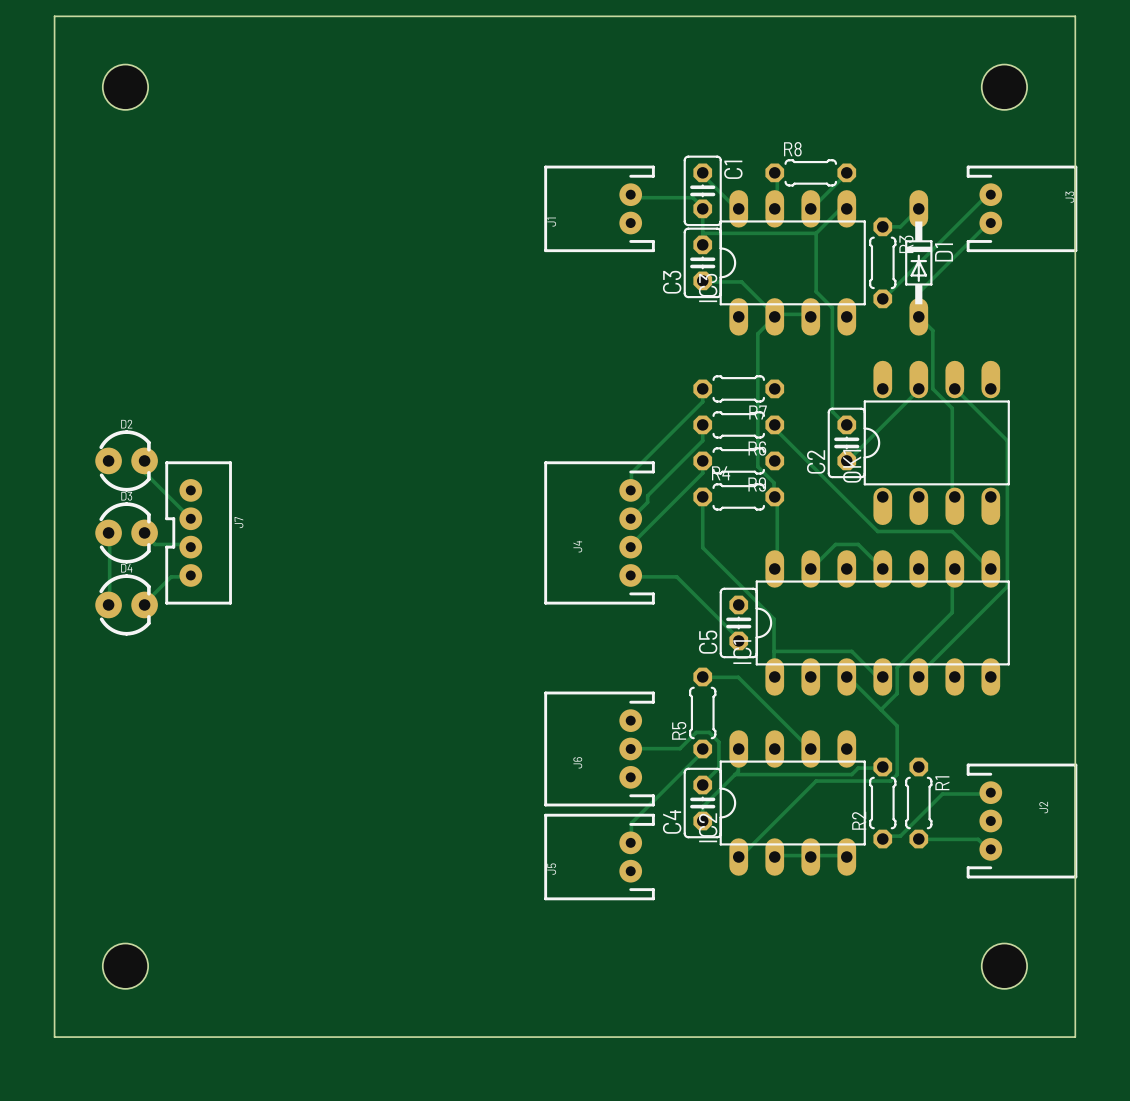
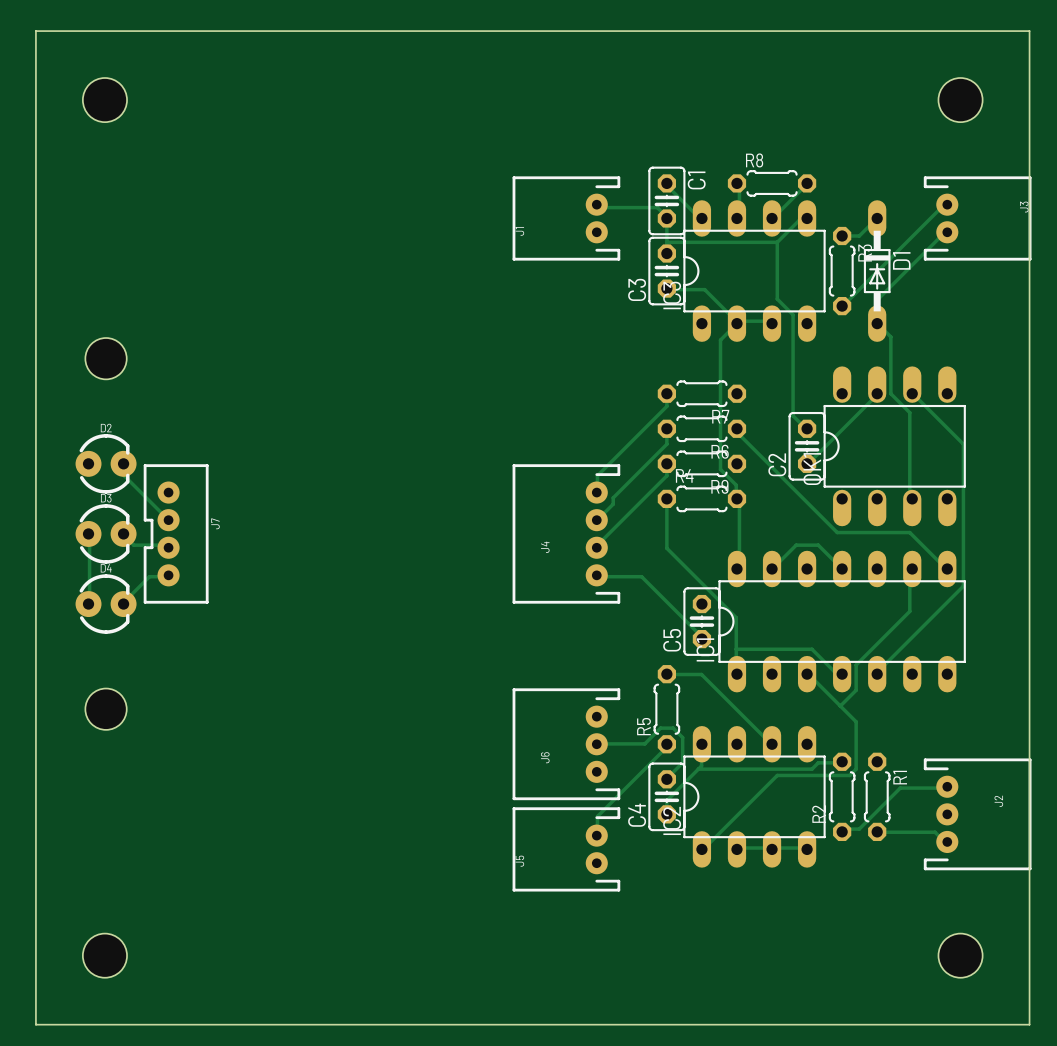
hole: none -> (106, 358)
hole: none -> (106, 709)

